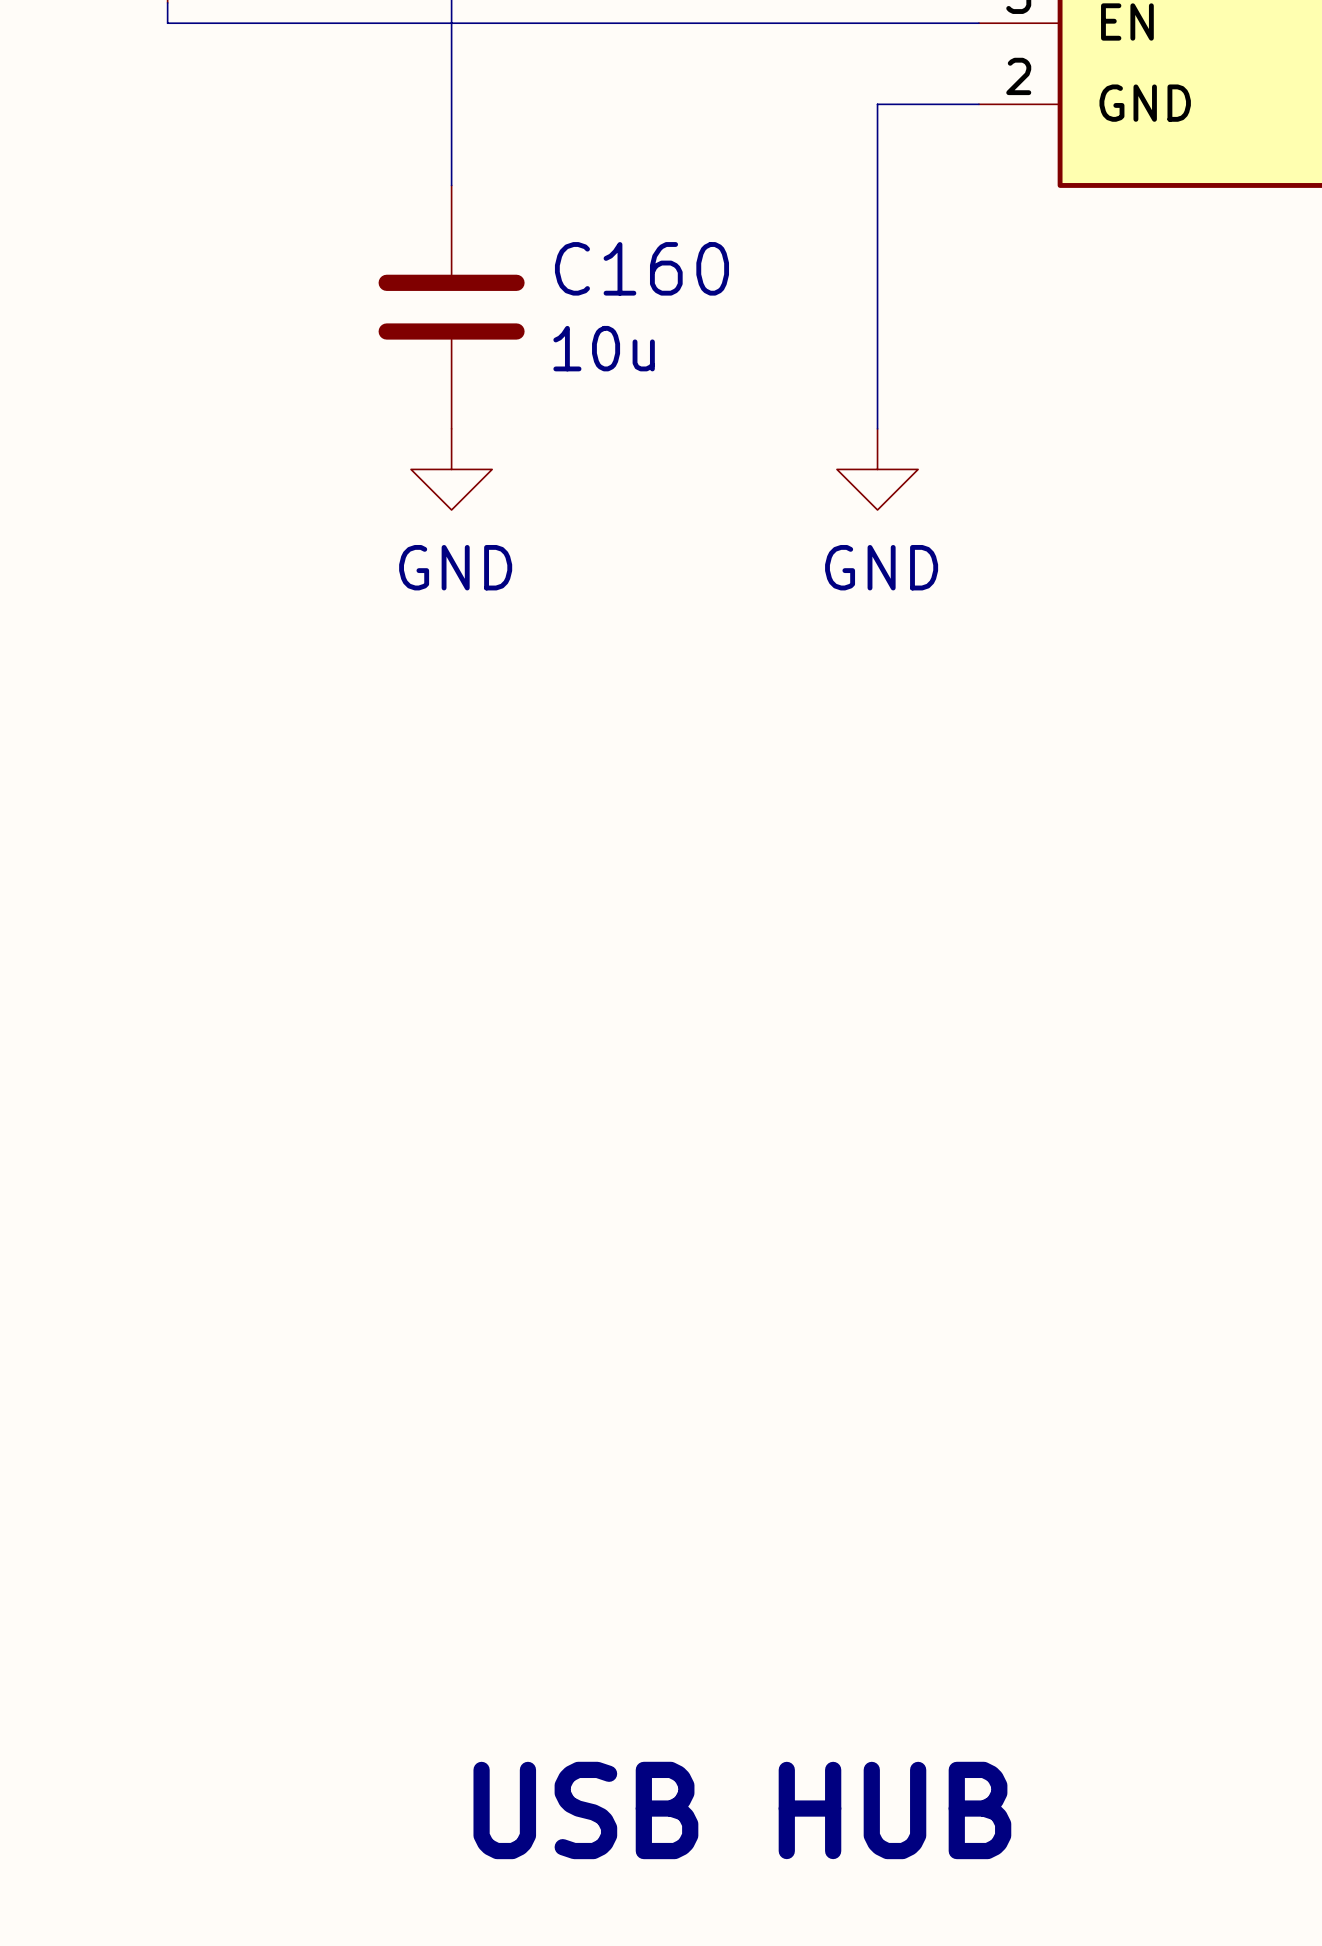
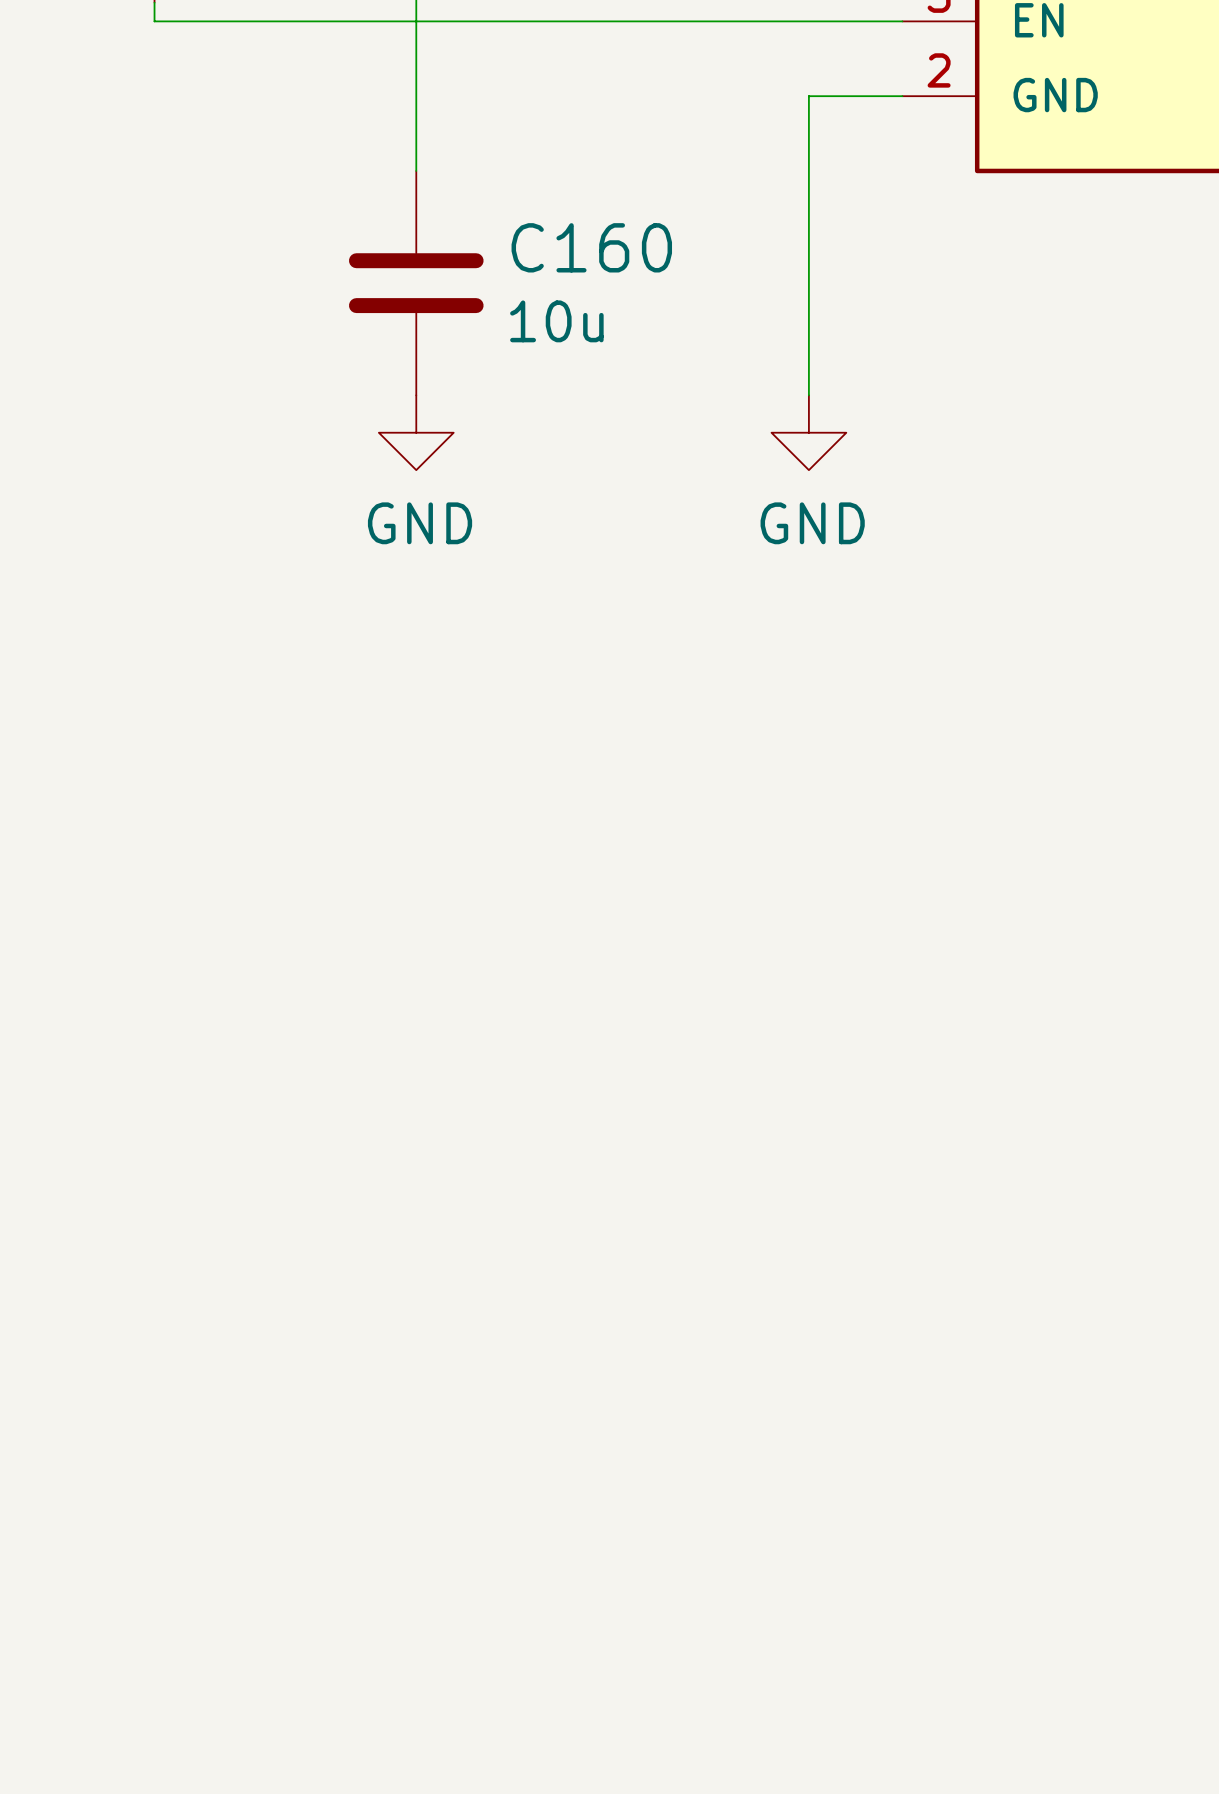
text: USB HUB (742, 1810) -> none

